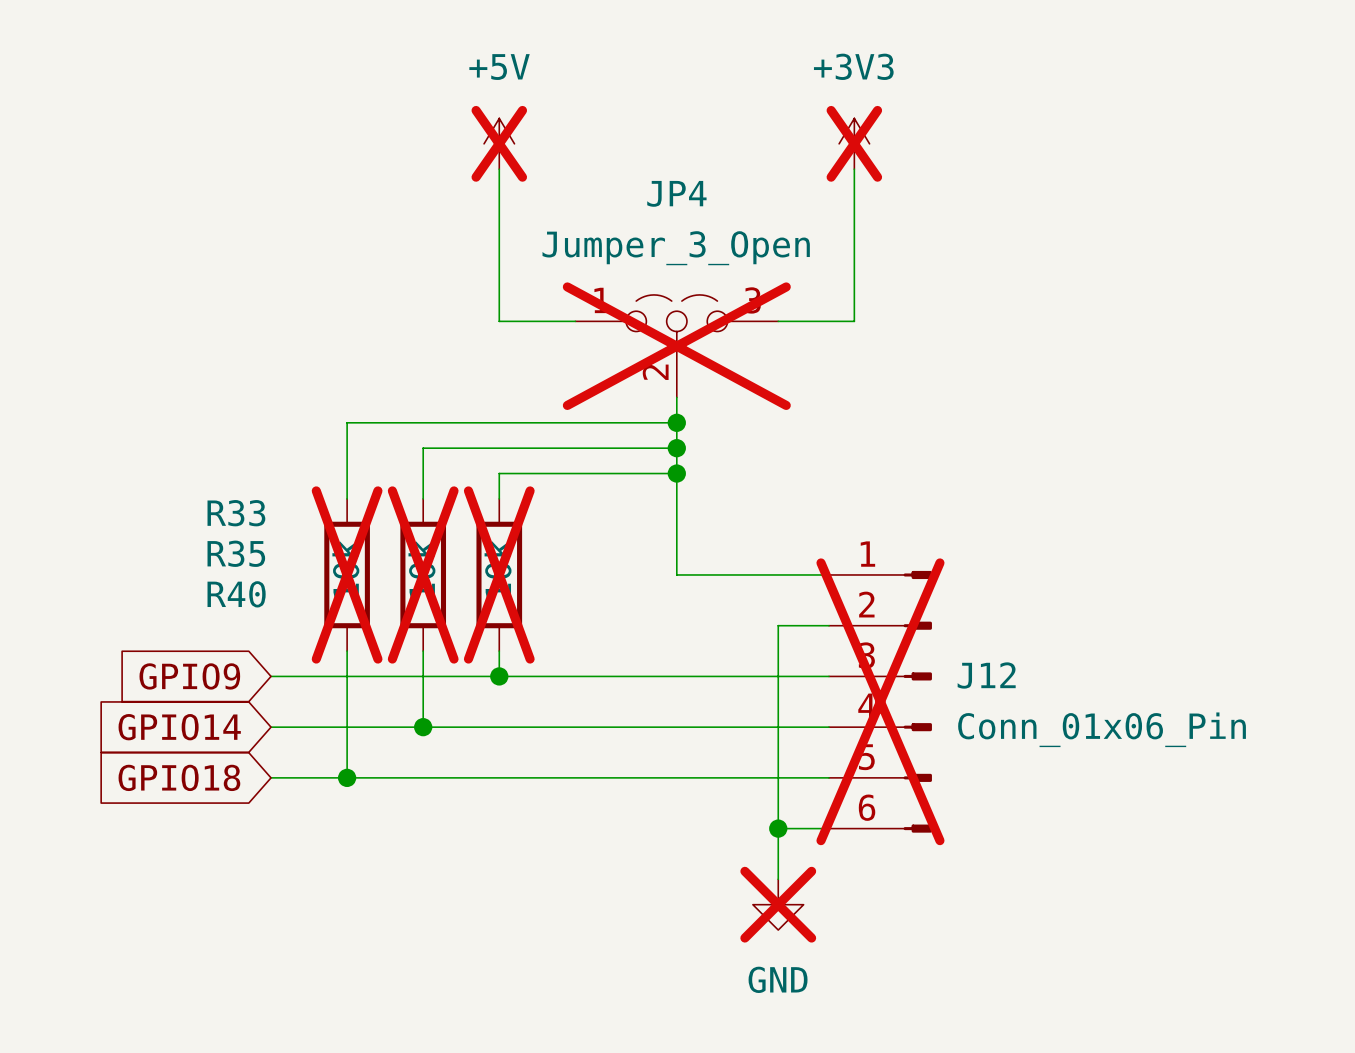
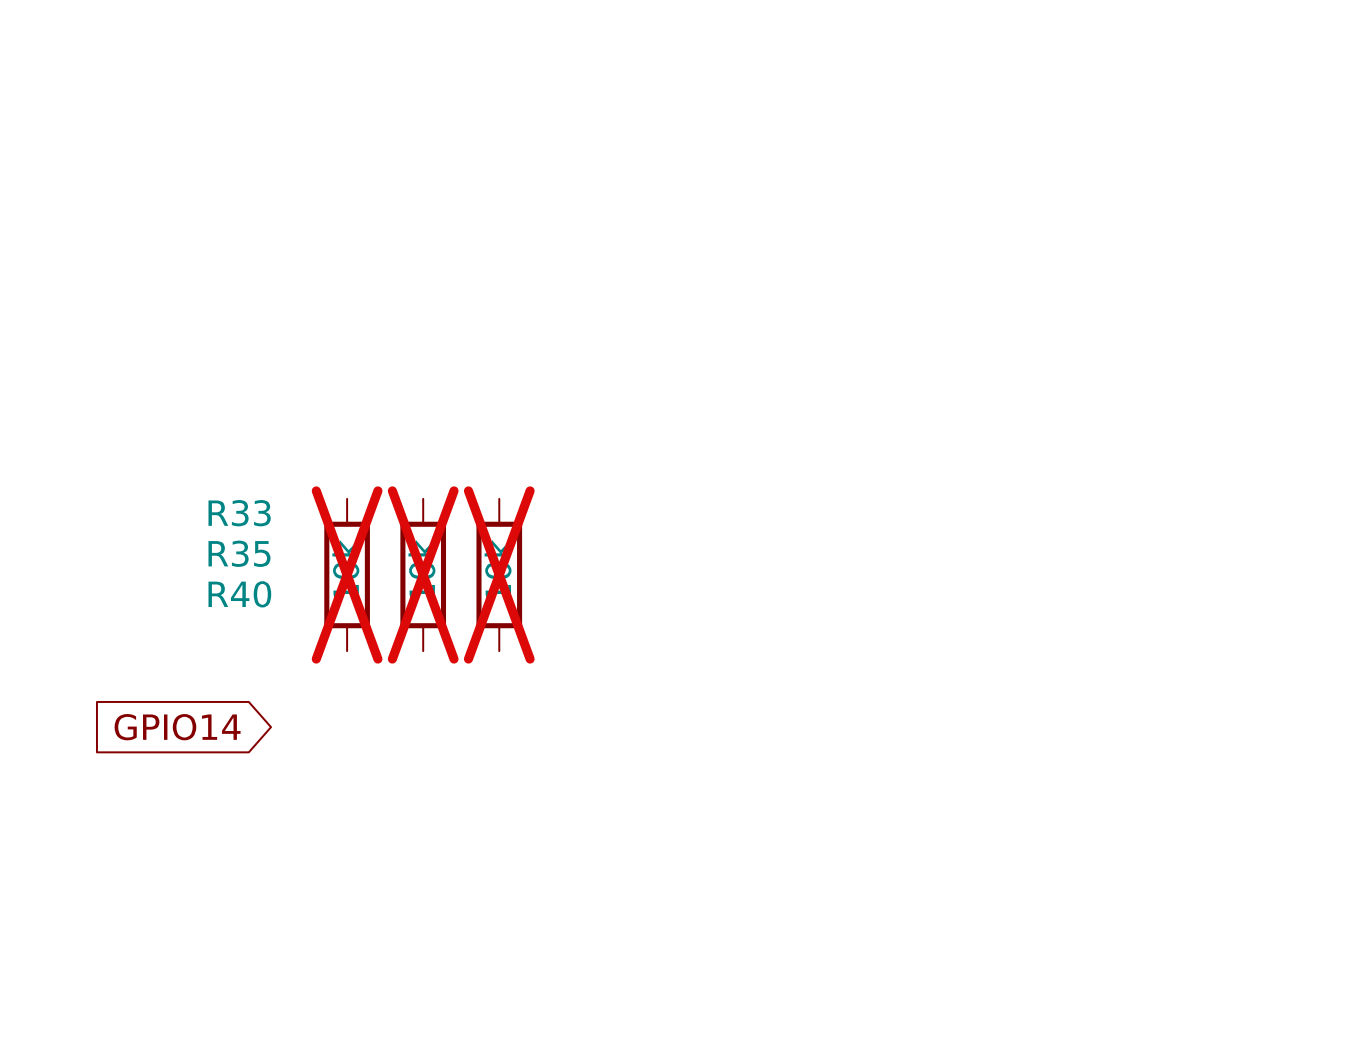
power symbol: +5V (499, 143) -> none
power symbol: +3V3 (854, 143) -> none
wire: (499, 169) (499, 321) (575, 321) -> none
wire: (854, 169) (854, 321) (778, 321) -> none
JP4: Jumper_3_Open (676, 346) -> none
wire: (676, 397) (676, 574) (828, 574) -> none
wire: (676, 422) (347, 422) (347, 498) -> none
junction: (676, 422) -> none
wire: (676, 448) (423, 448) (423, 498) -> none
junction: (676, 448) -> none
wire: (676, 473) (499, 473) (499, 498) -> none
junction: (676, 473) -> none
wire: (828, 625) (778, 625) (778, 879) -> none
wire: (347, 651) (347, 777) -> none
wire: (423, 651) (423, 727) -> none
wire: (499, 651) (499, 676) -> none
global label: GPIO9 (189, 676) -> none
wire: (271, 676) (828, 676) -> none
junction: (499, 676) -> none
J12: Conn_01x06_Pin (880, 701) -> none
wire: (271, 727) (828, 727) -> none
junction: (423, 727) -> none
global label: GPIO18 (179, 777) -> none
wire: (271, 777) (828, 777) -> none
junction: (347, 777) -> none
wire: (778, 828) (828, 828) -> none
junction: (778, 828) -> none
power symbol: GND (778, 904) -> none

